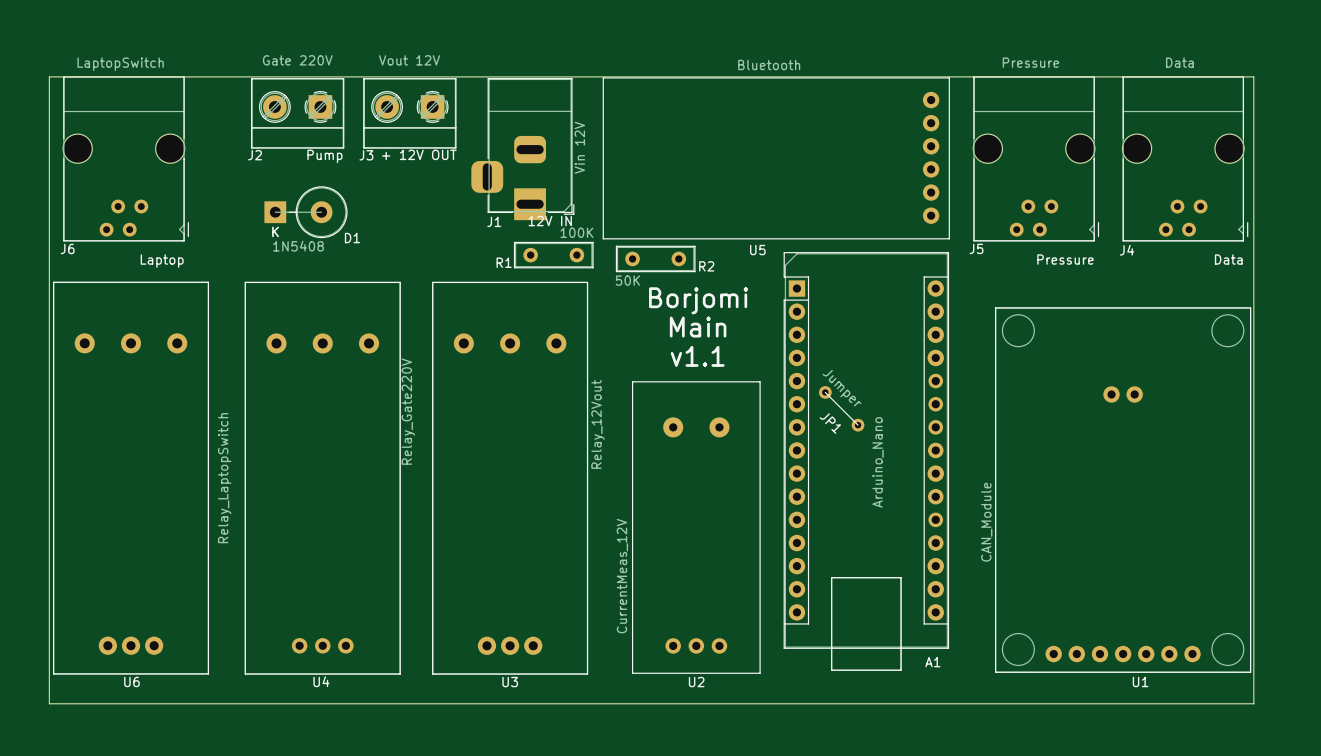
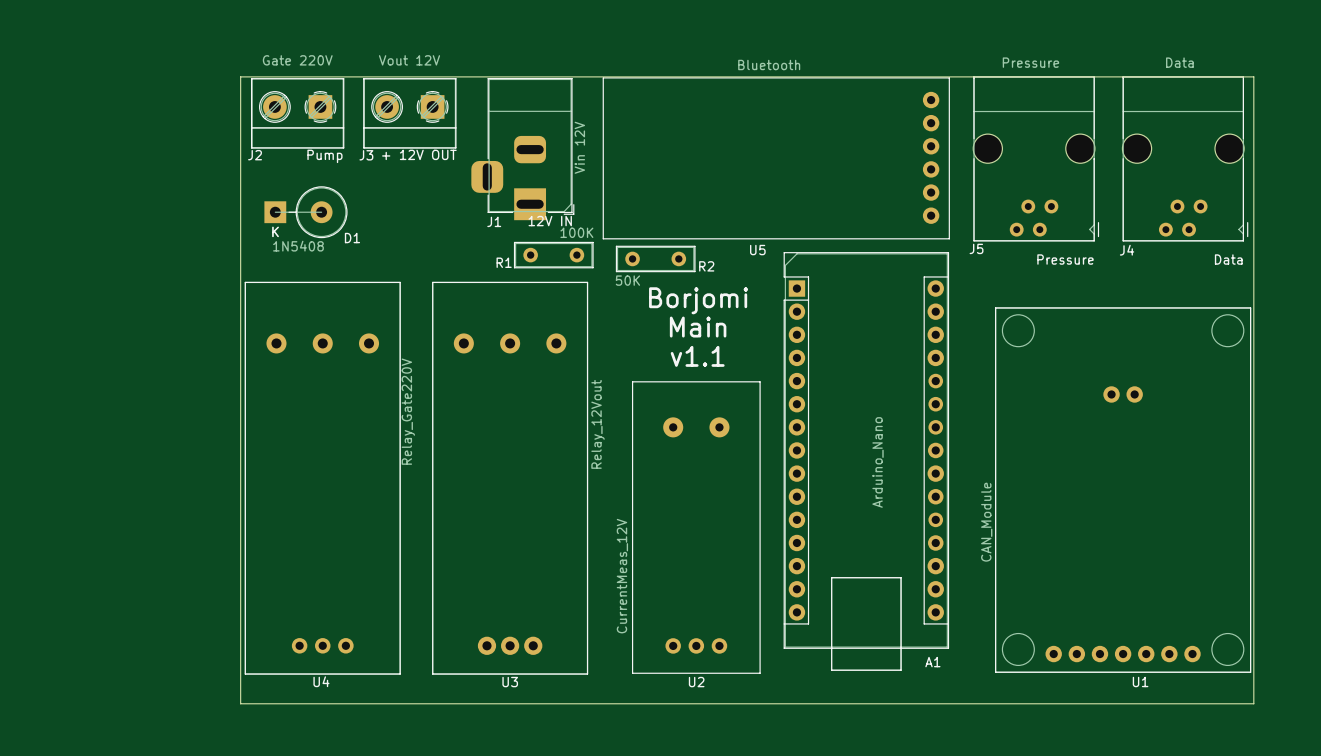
board edge: (240, 76) (49, 76) (49, 703) (240, 703) -> (240, 76) (240, 703)
J6: LaptopSwitch (126, 158) -> none
text: Laptop (162, 261) -> none
JP1: Jumper (841, 408) -> none
U6: Relay_LaptopSwitch (131, 478) -> none

